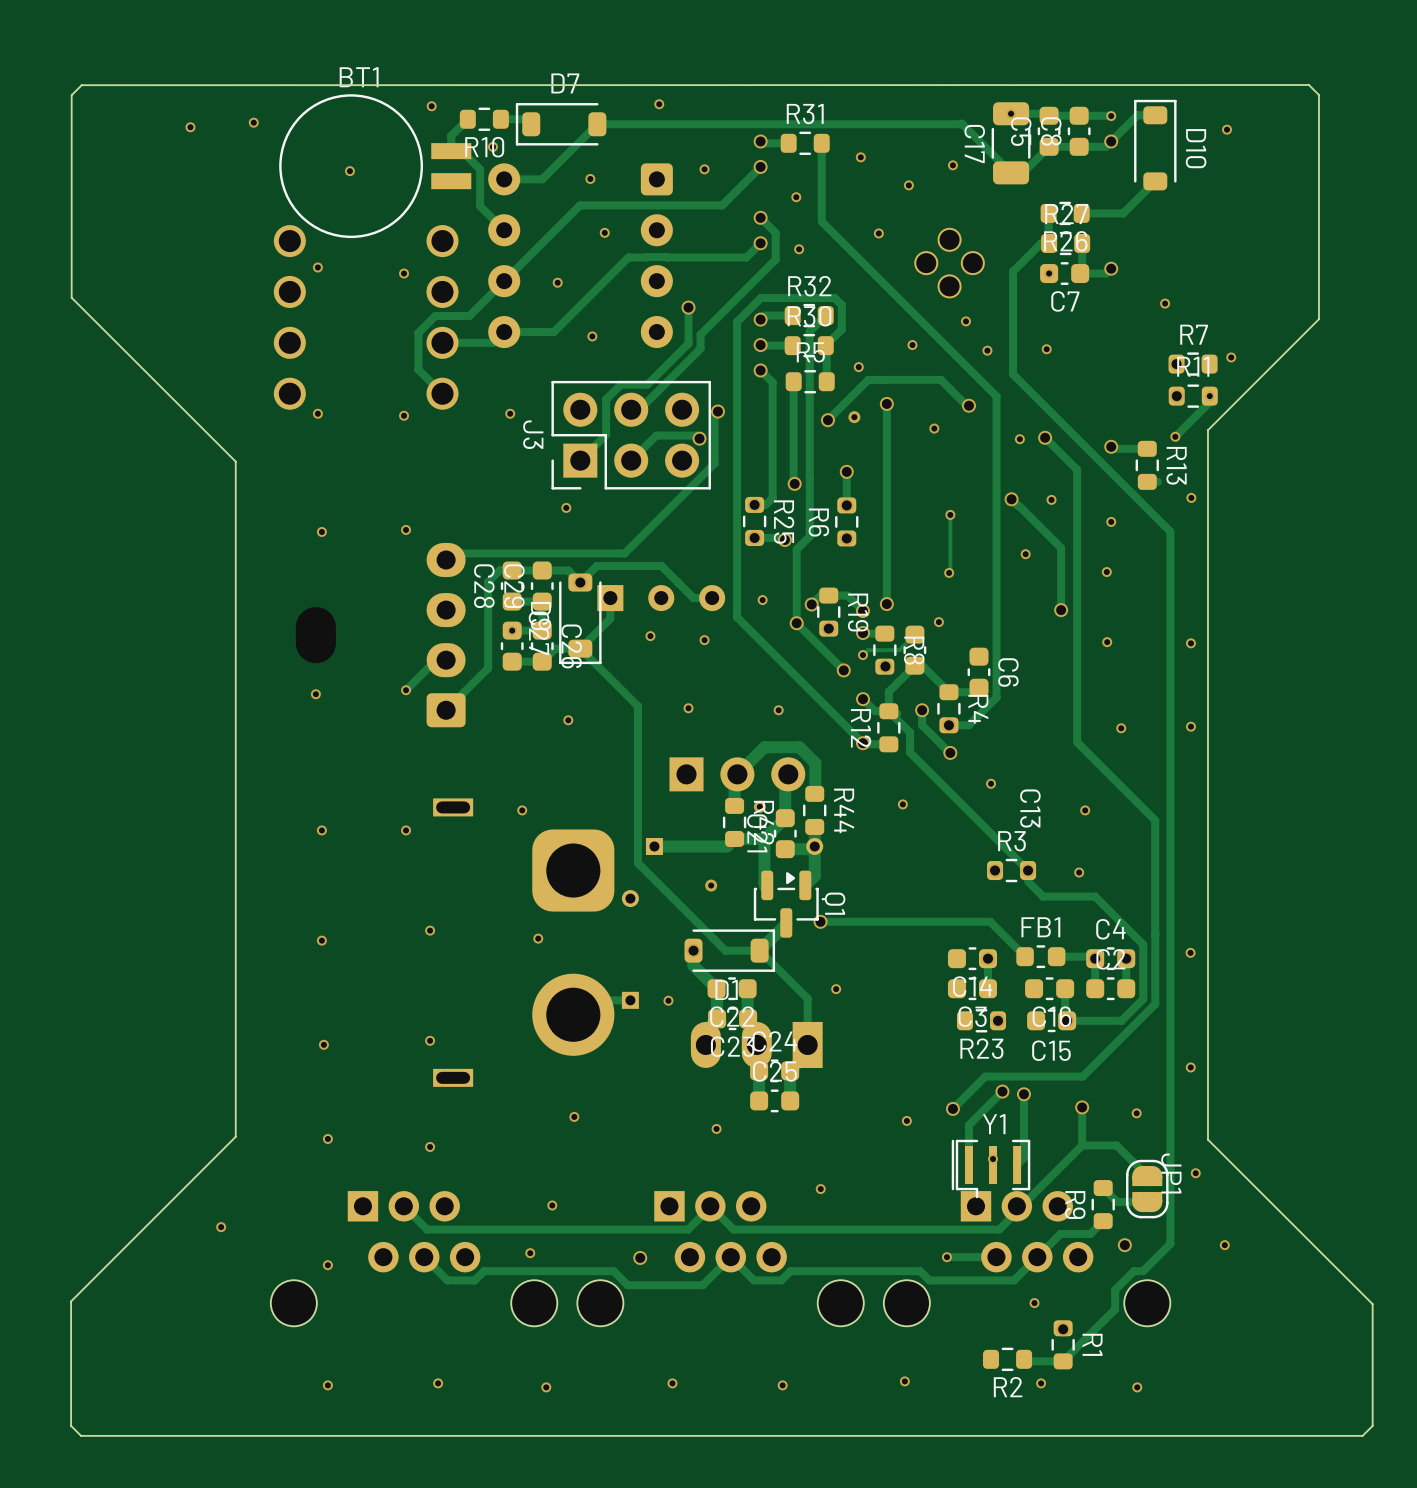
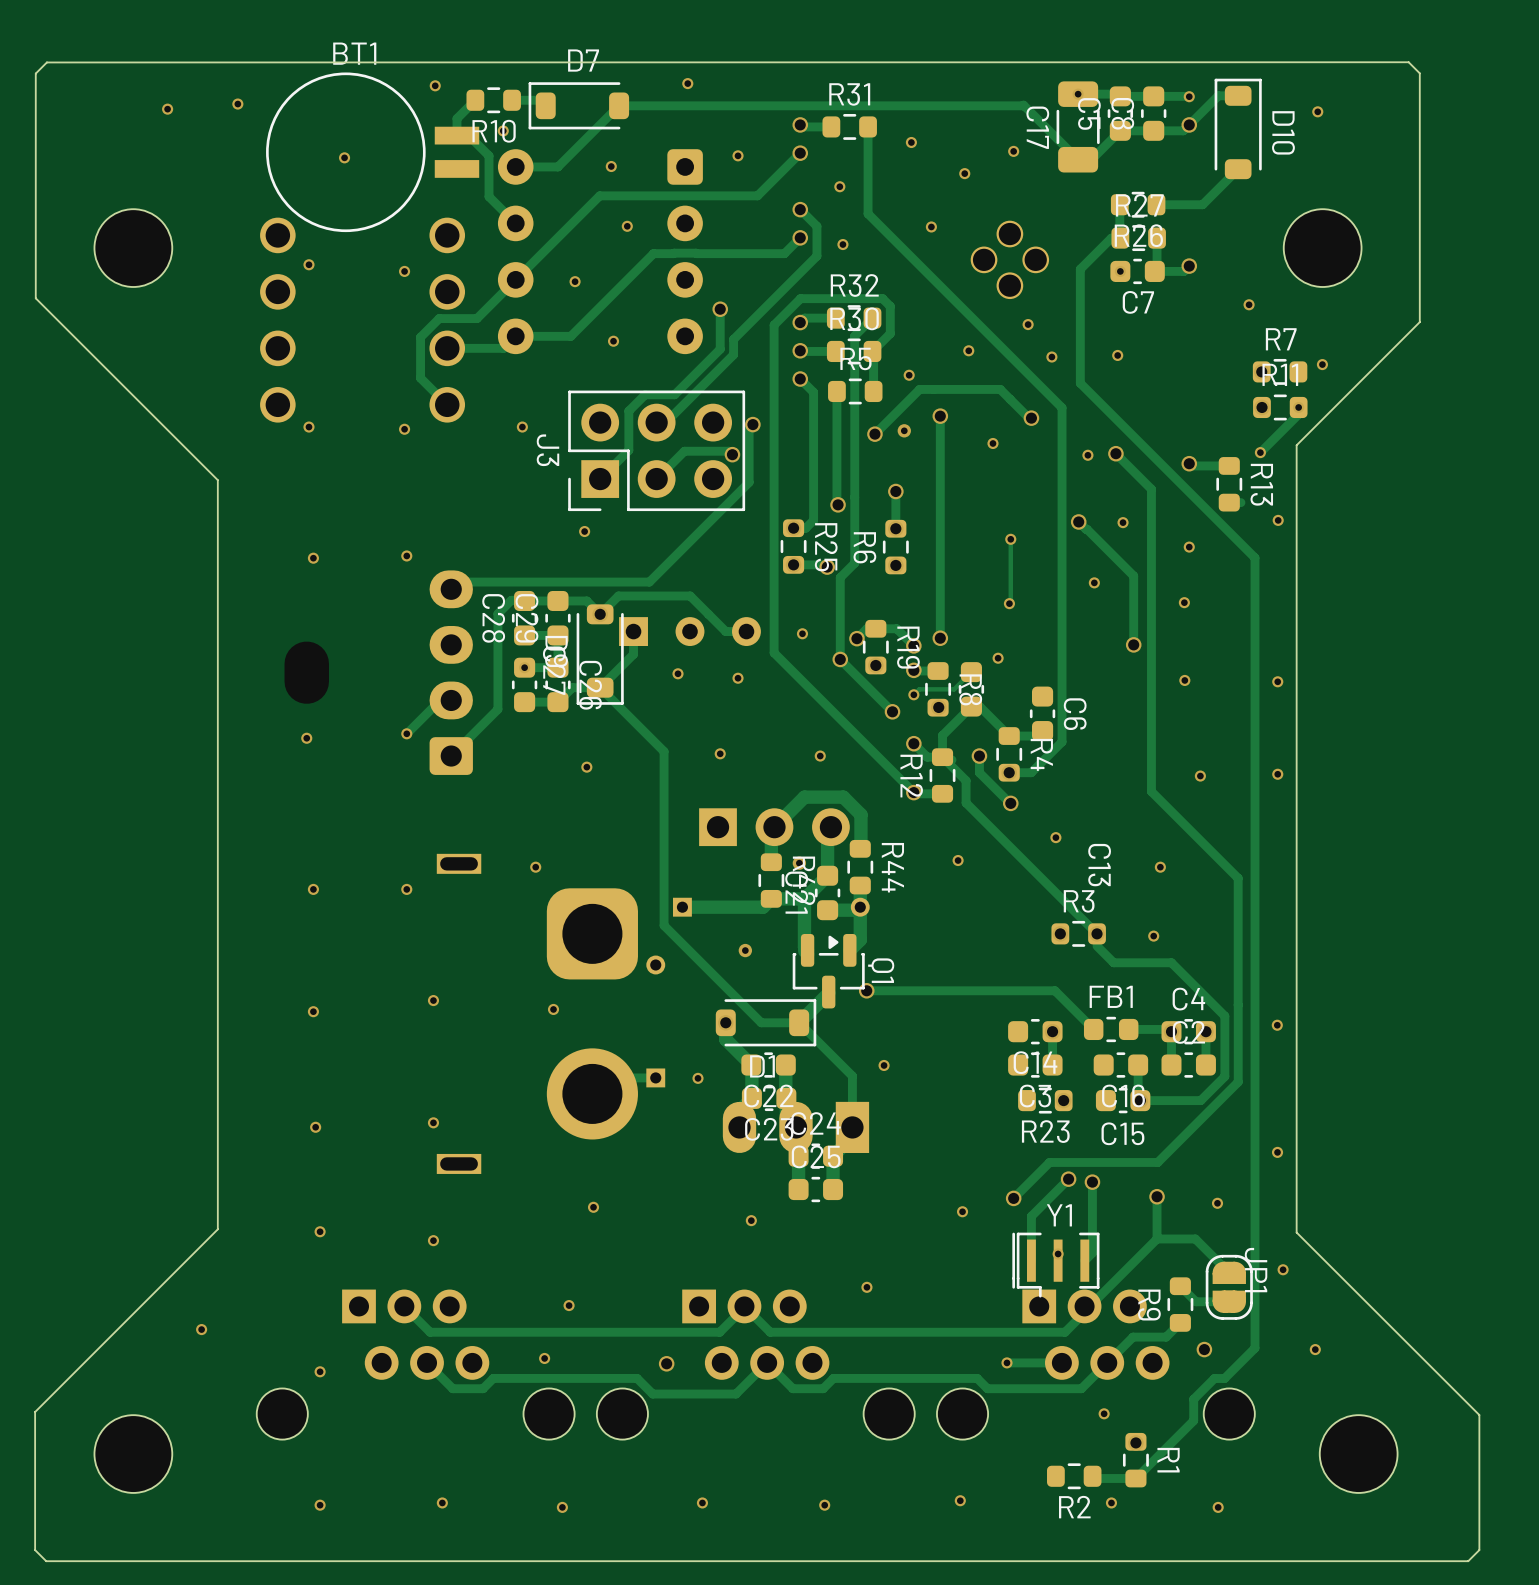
part: none -> (133, 248)
part: none -> (1322, 248)
part: none -> (133, 1454)
part: none -> (1358, 1454)

